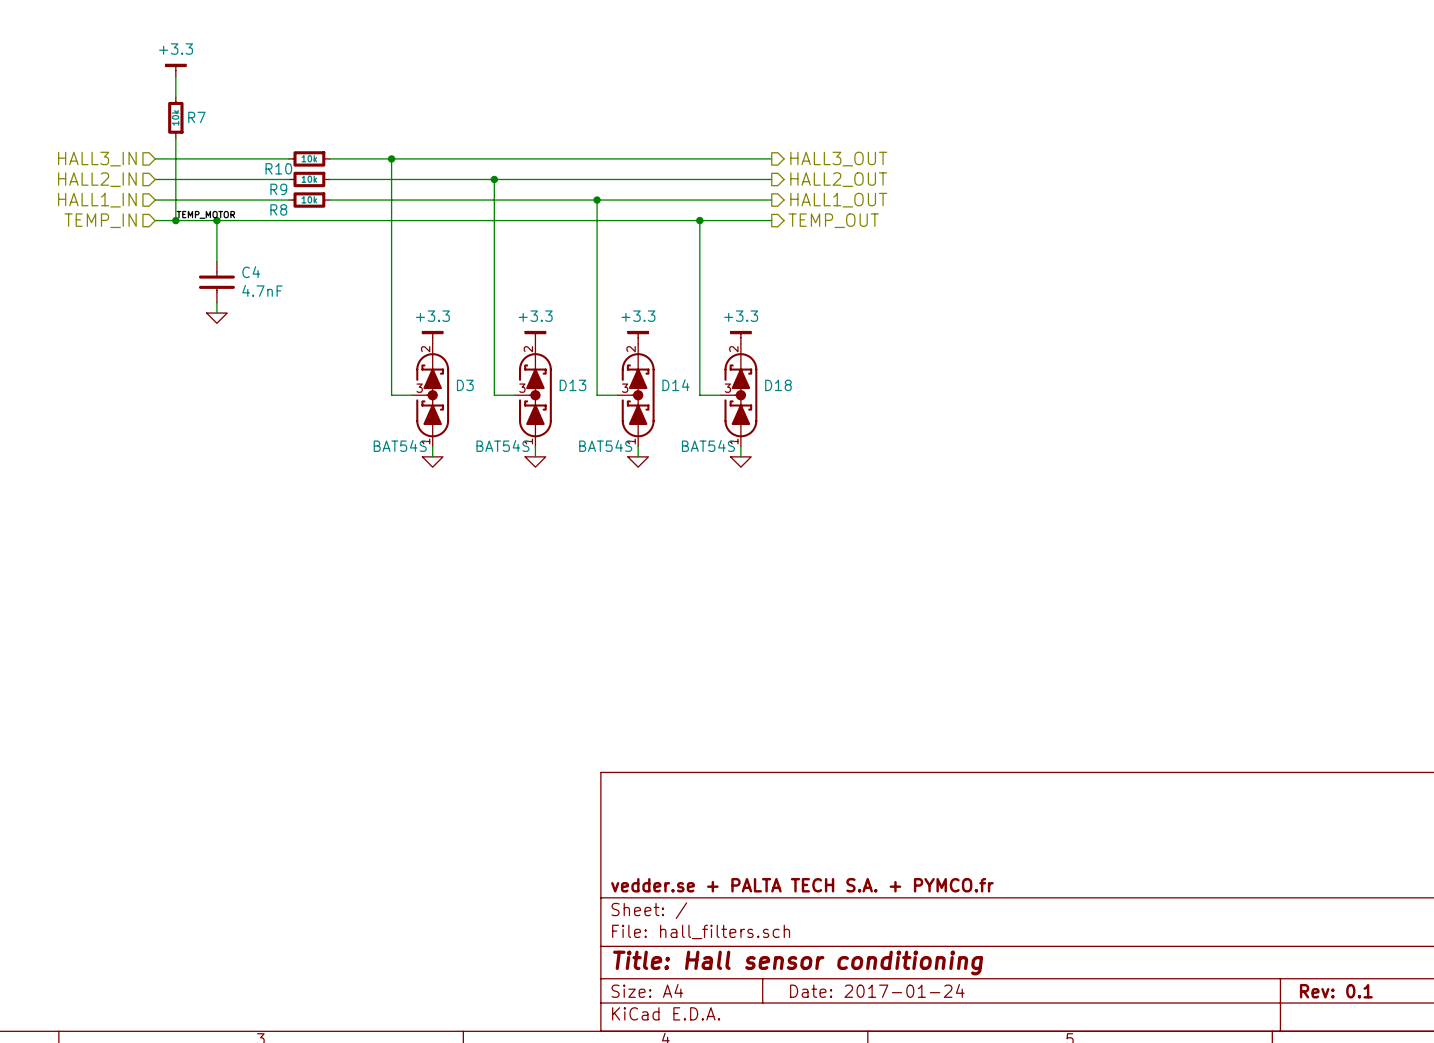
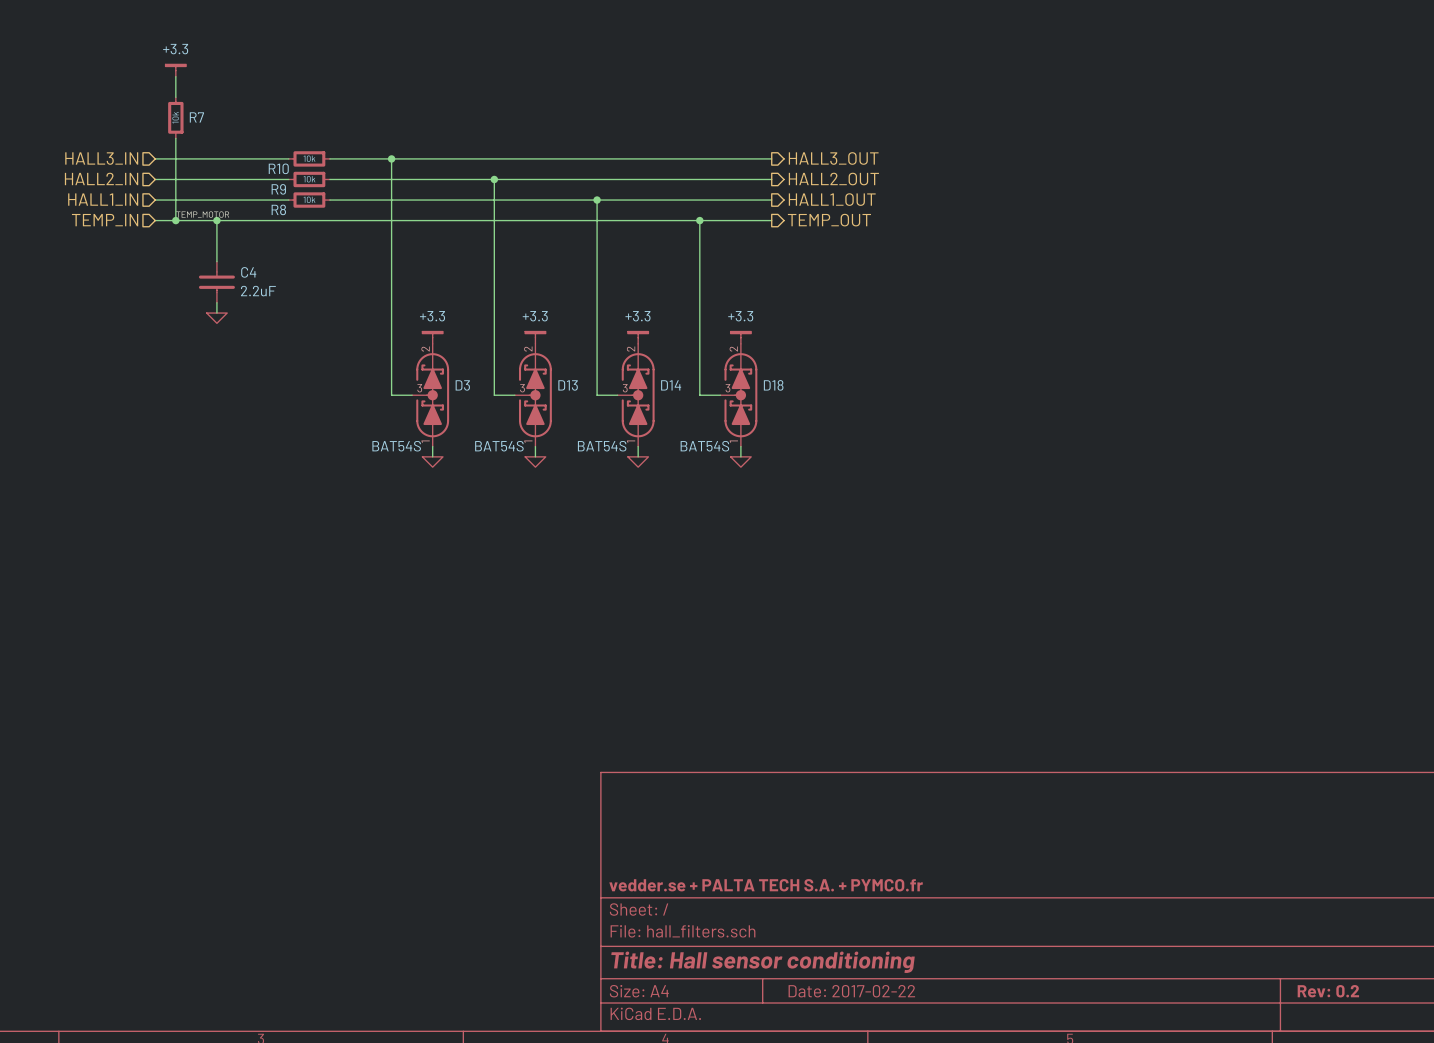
C4 value: 4.7nF (262, 290) -> 2.2uF (258, 291)
title block: Date: 2017-01-24 (877, 990) -> Date: 2017-02-22 (851, 991)
title block: Rev: 0.1 (1336, 991) -> Rev: 0.2 (1328, 991)

